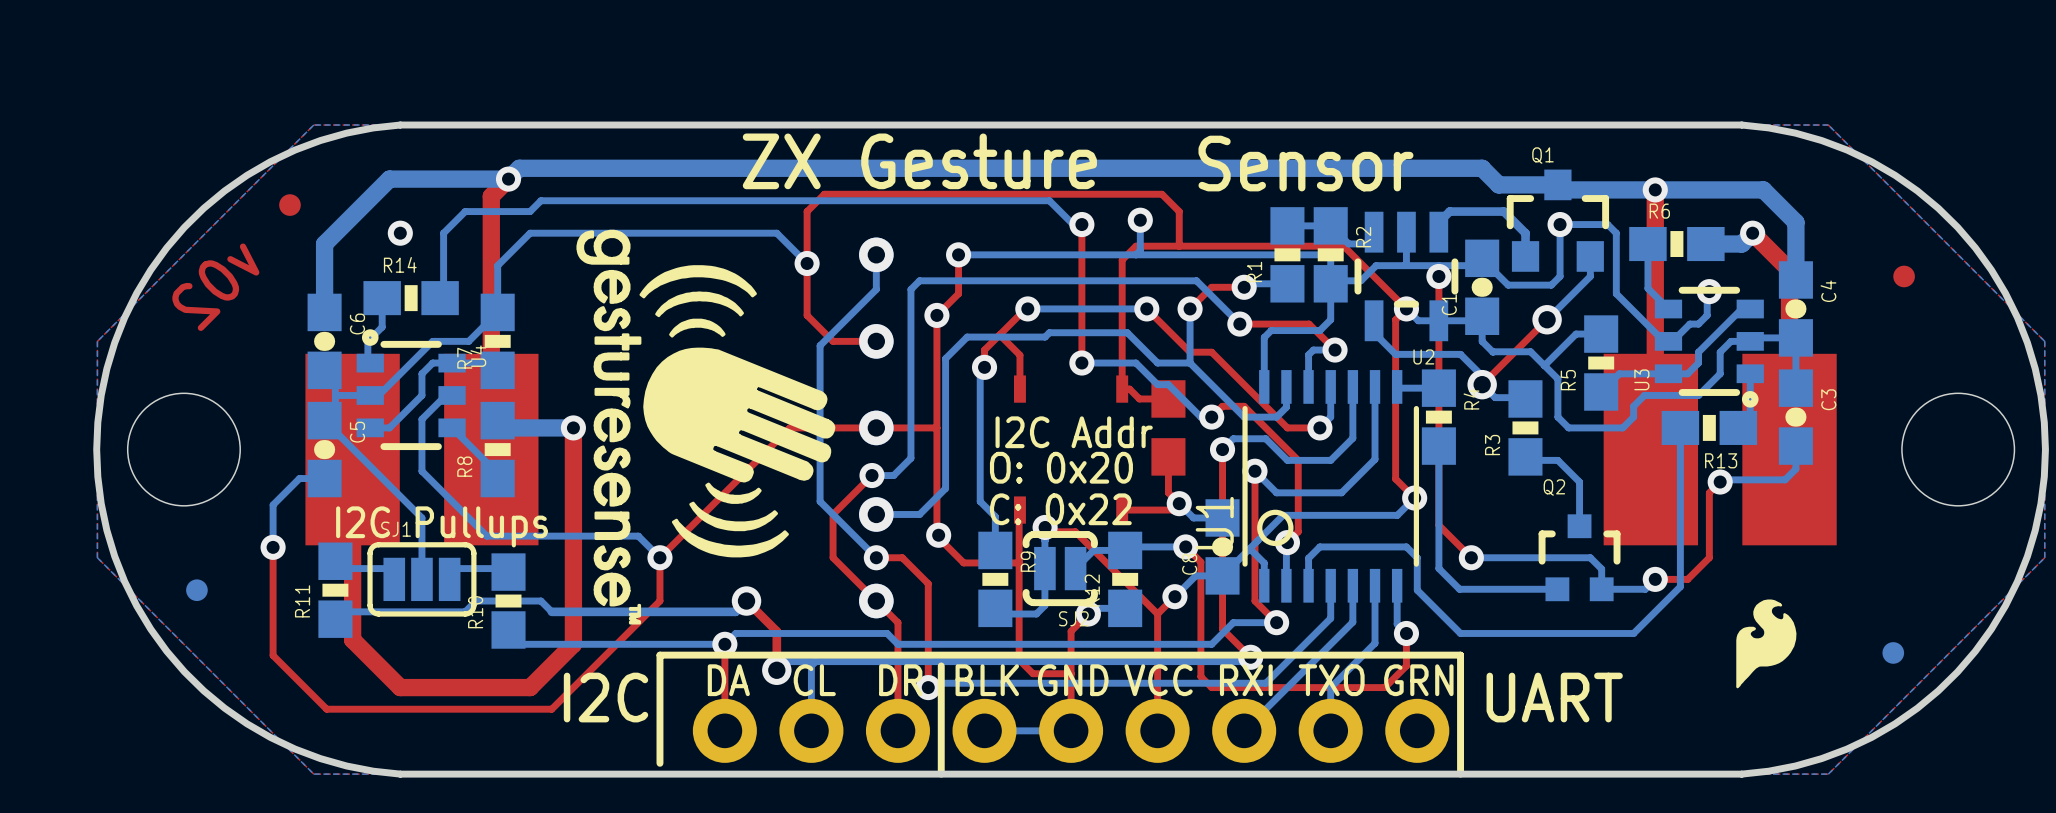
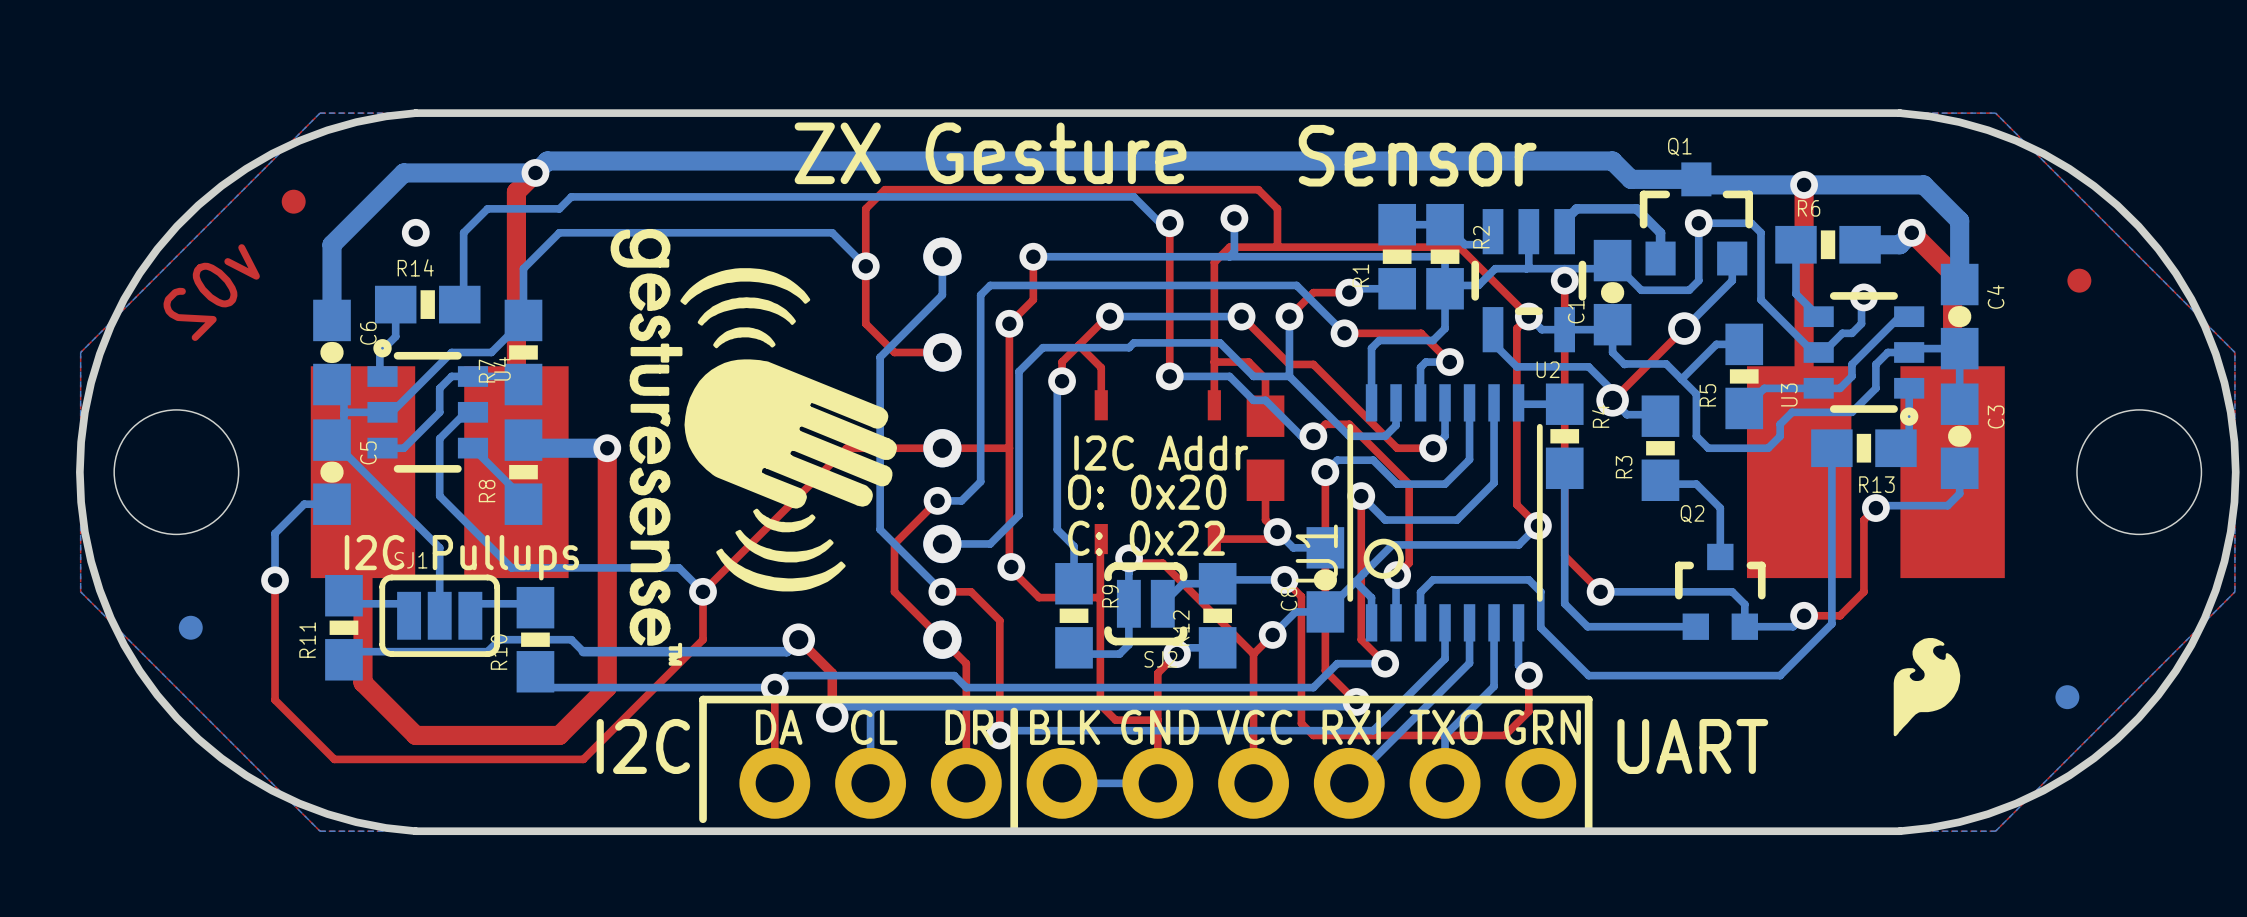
top track: (1122, 389) (1129, 389) (1139, 398) (1168, 398) -> (1214, 362) (1248, 362) (1265, 378) (1265, 416)

